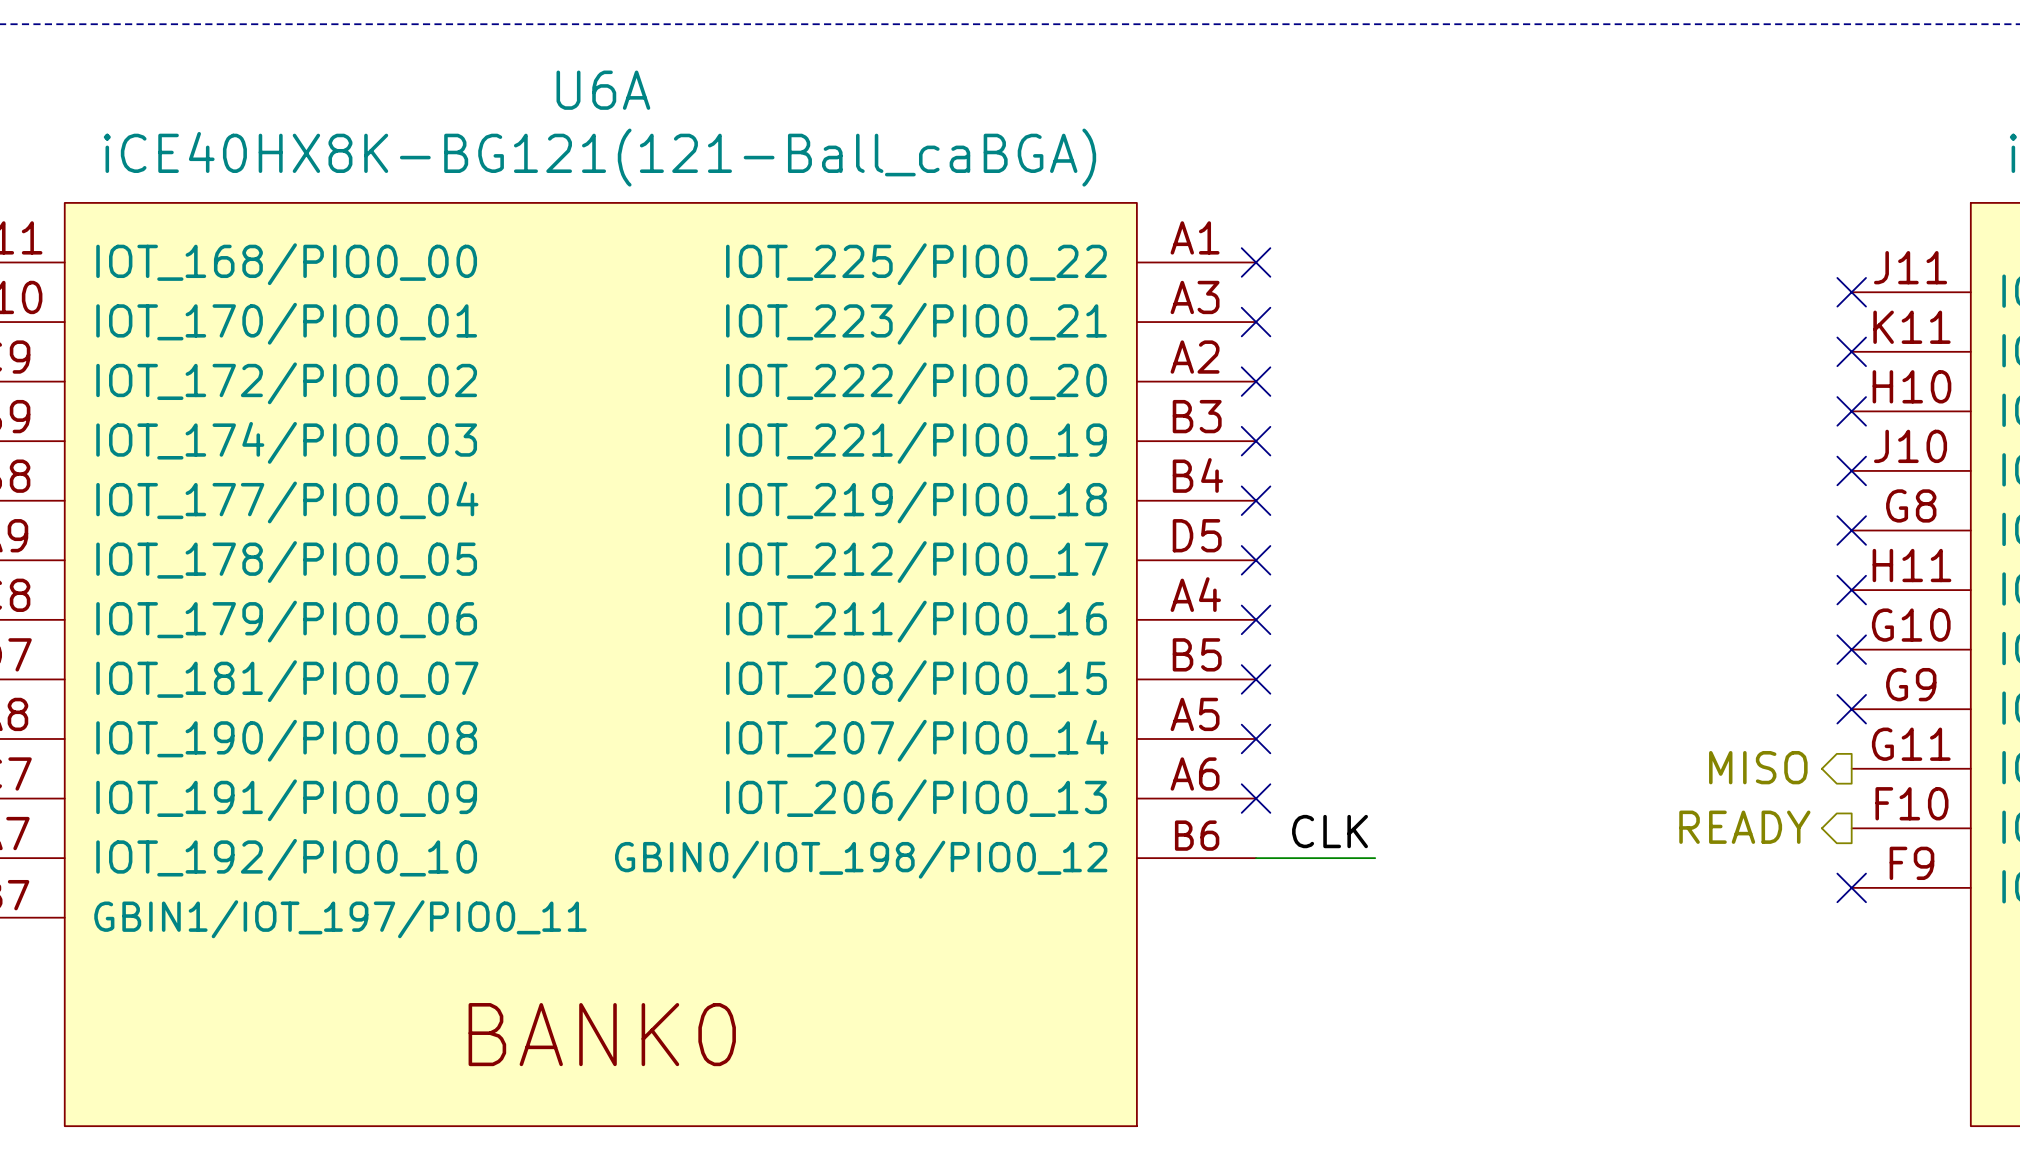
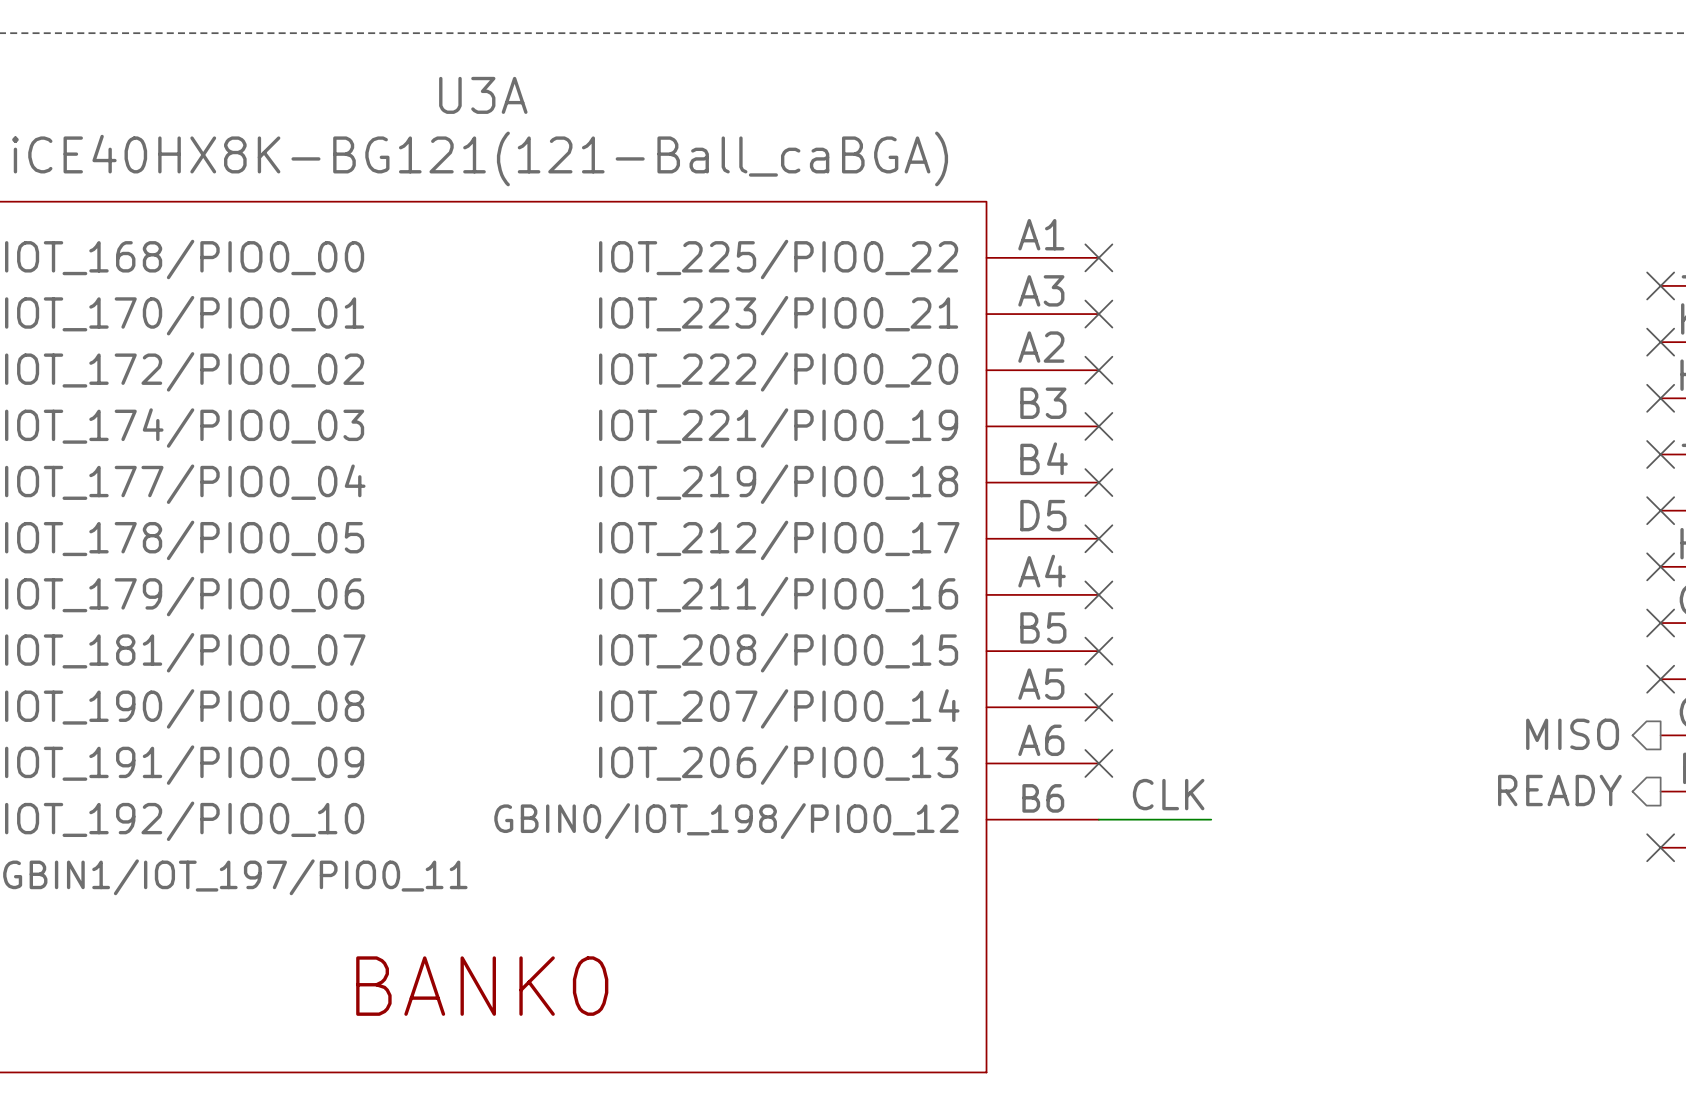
U6A name: U6A (603, 90) -> U3A (483, 95)

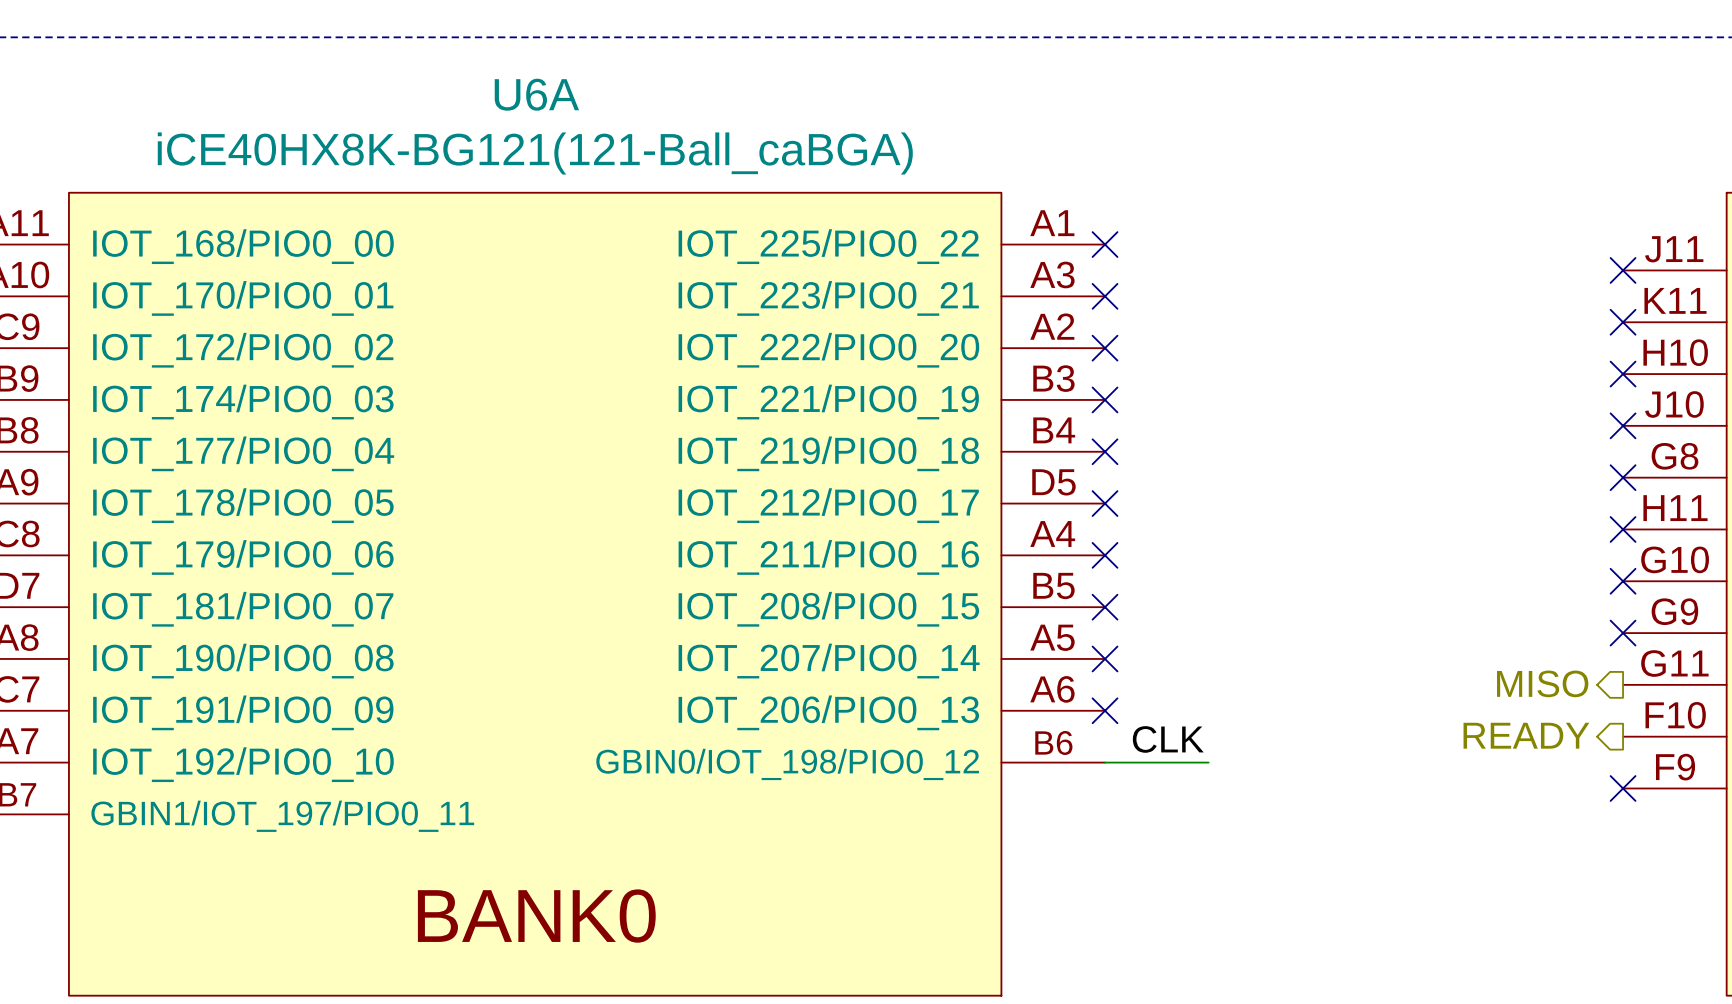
U3A name: U3A (483, 95) -> U6A (536, 94)

